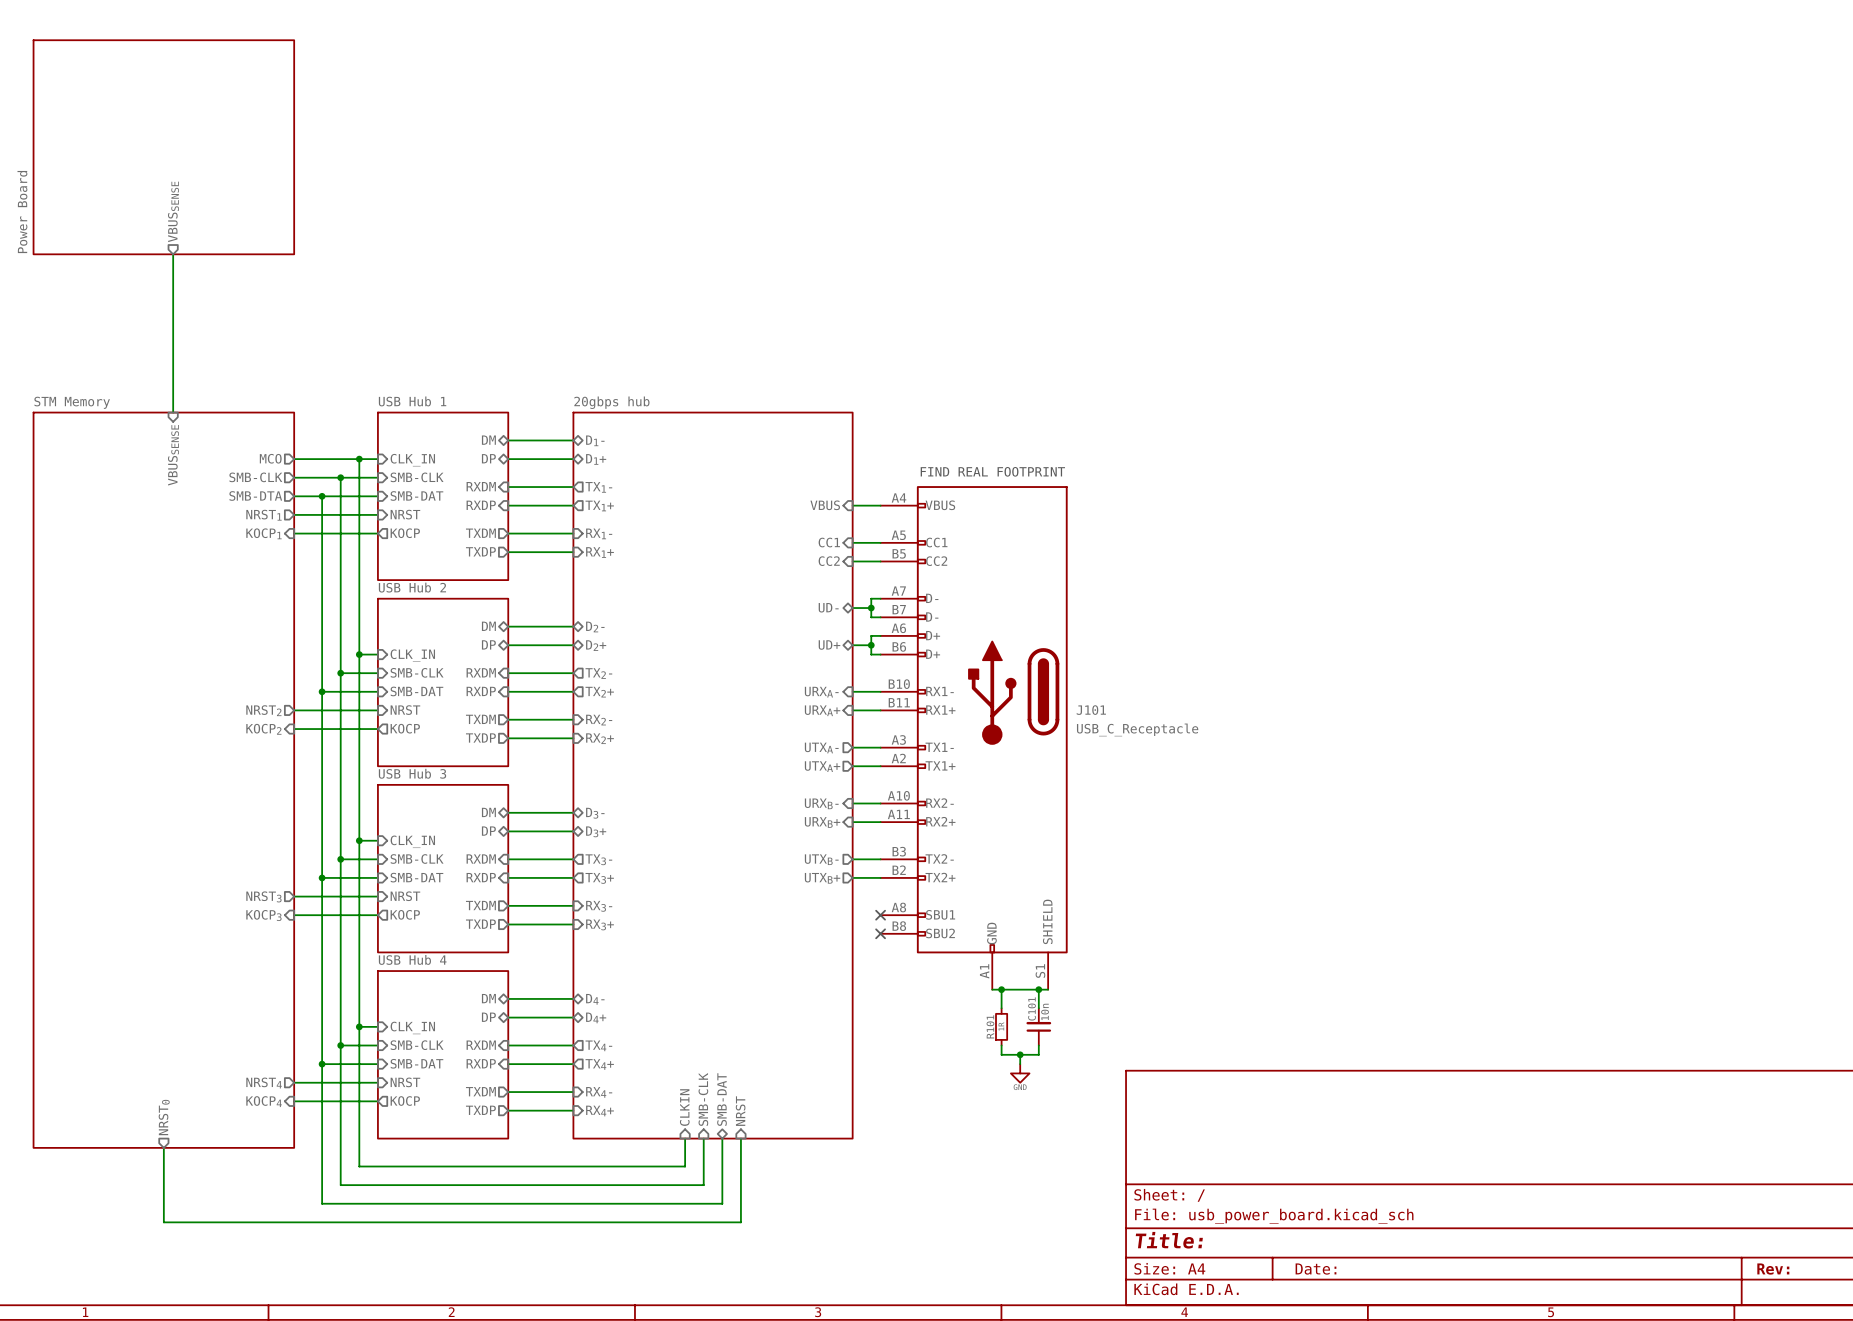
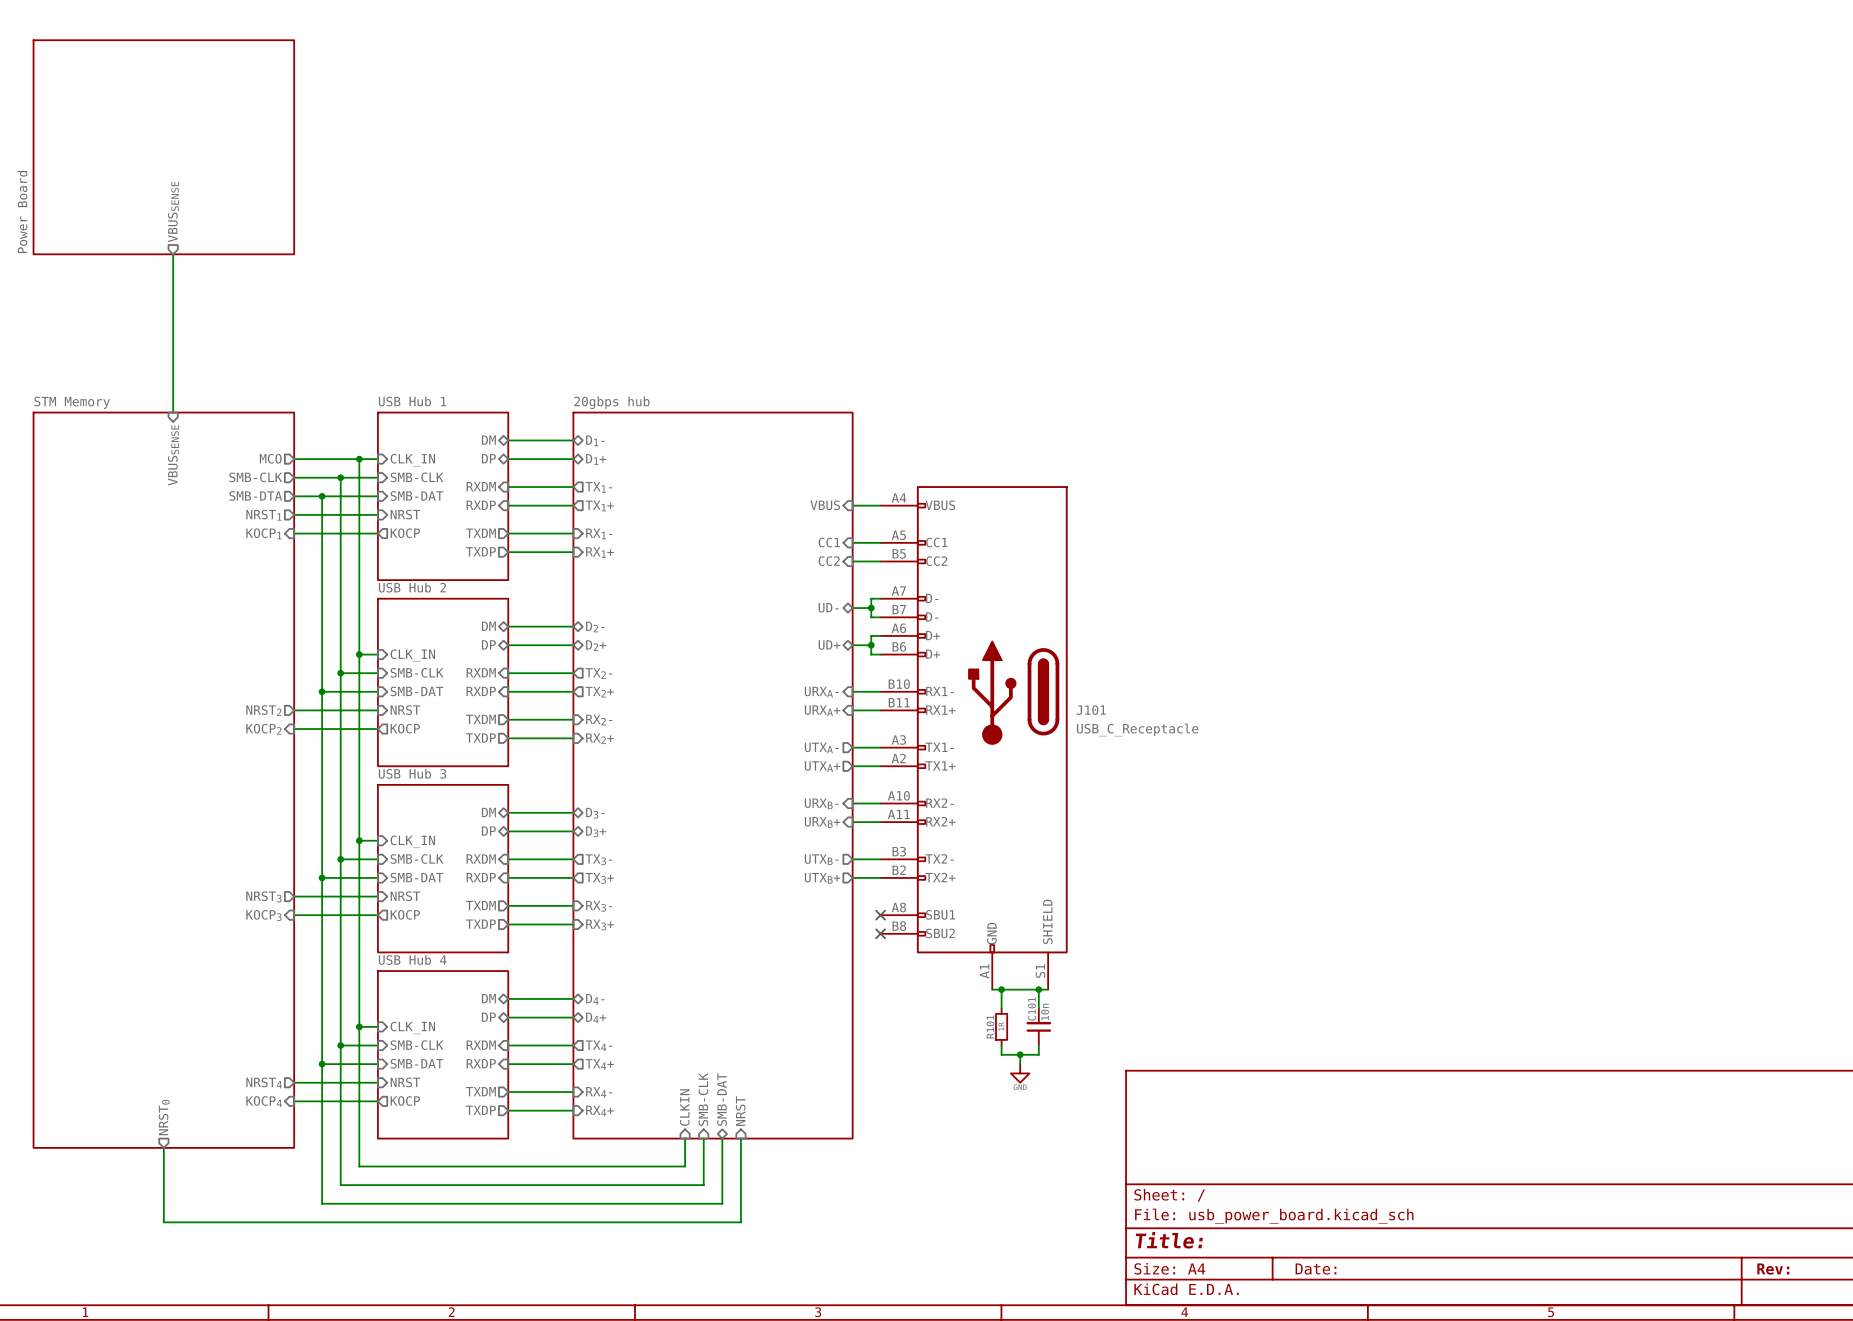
text: FIND REAL FOOTPRINT (992, 471) -> none

